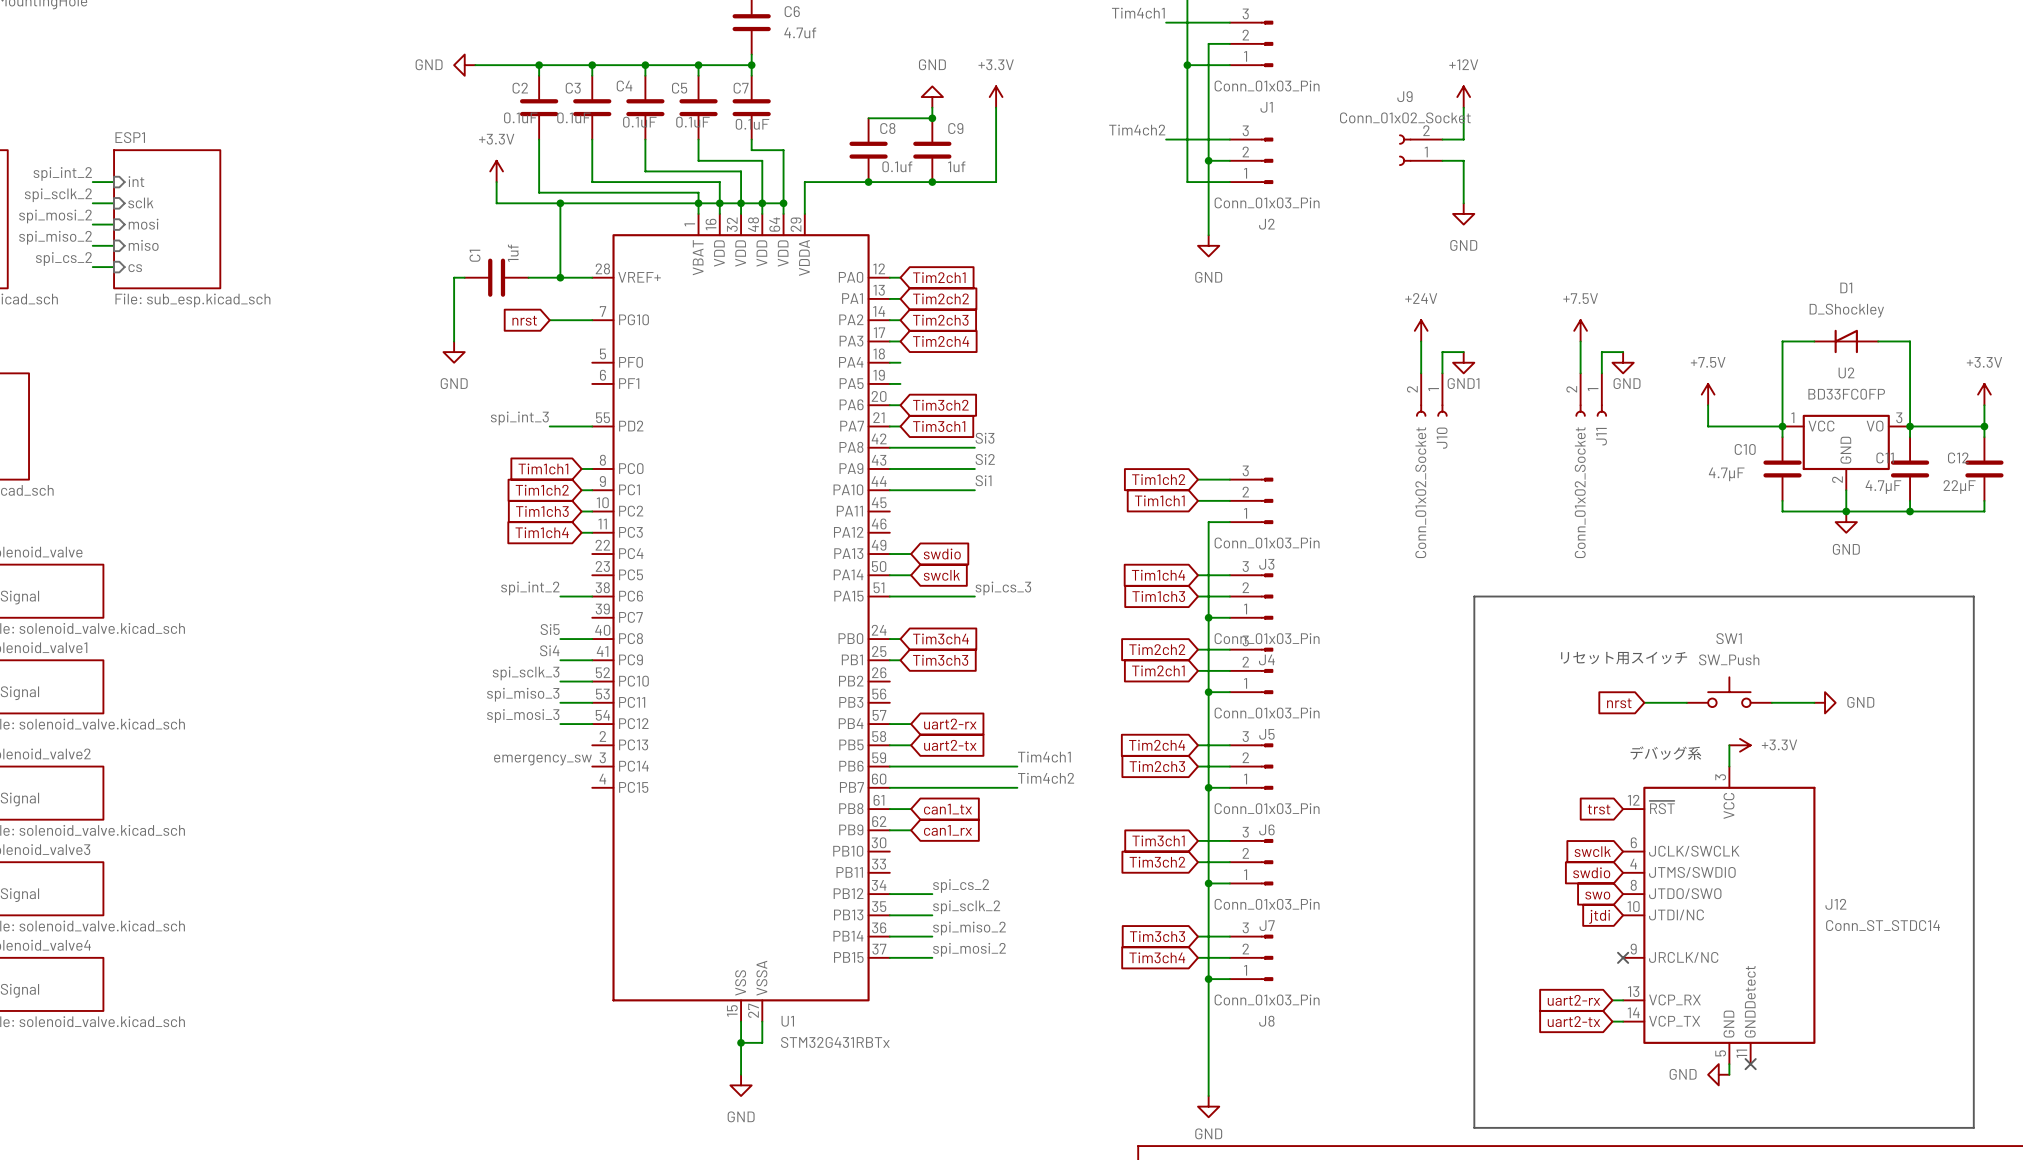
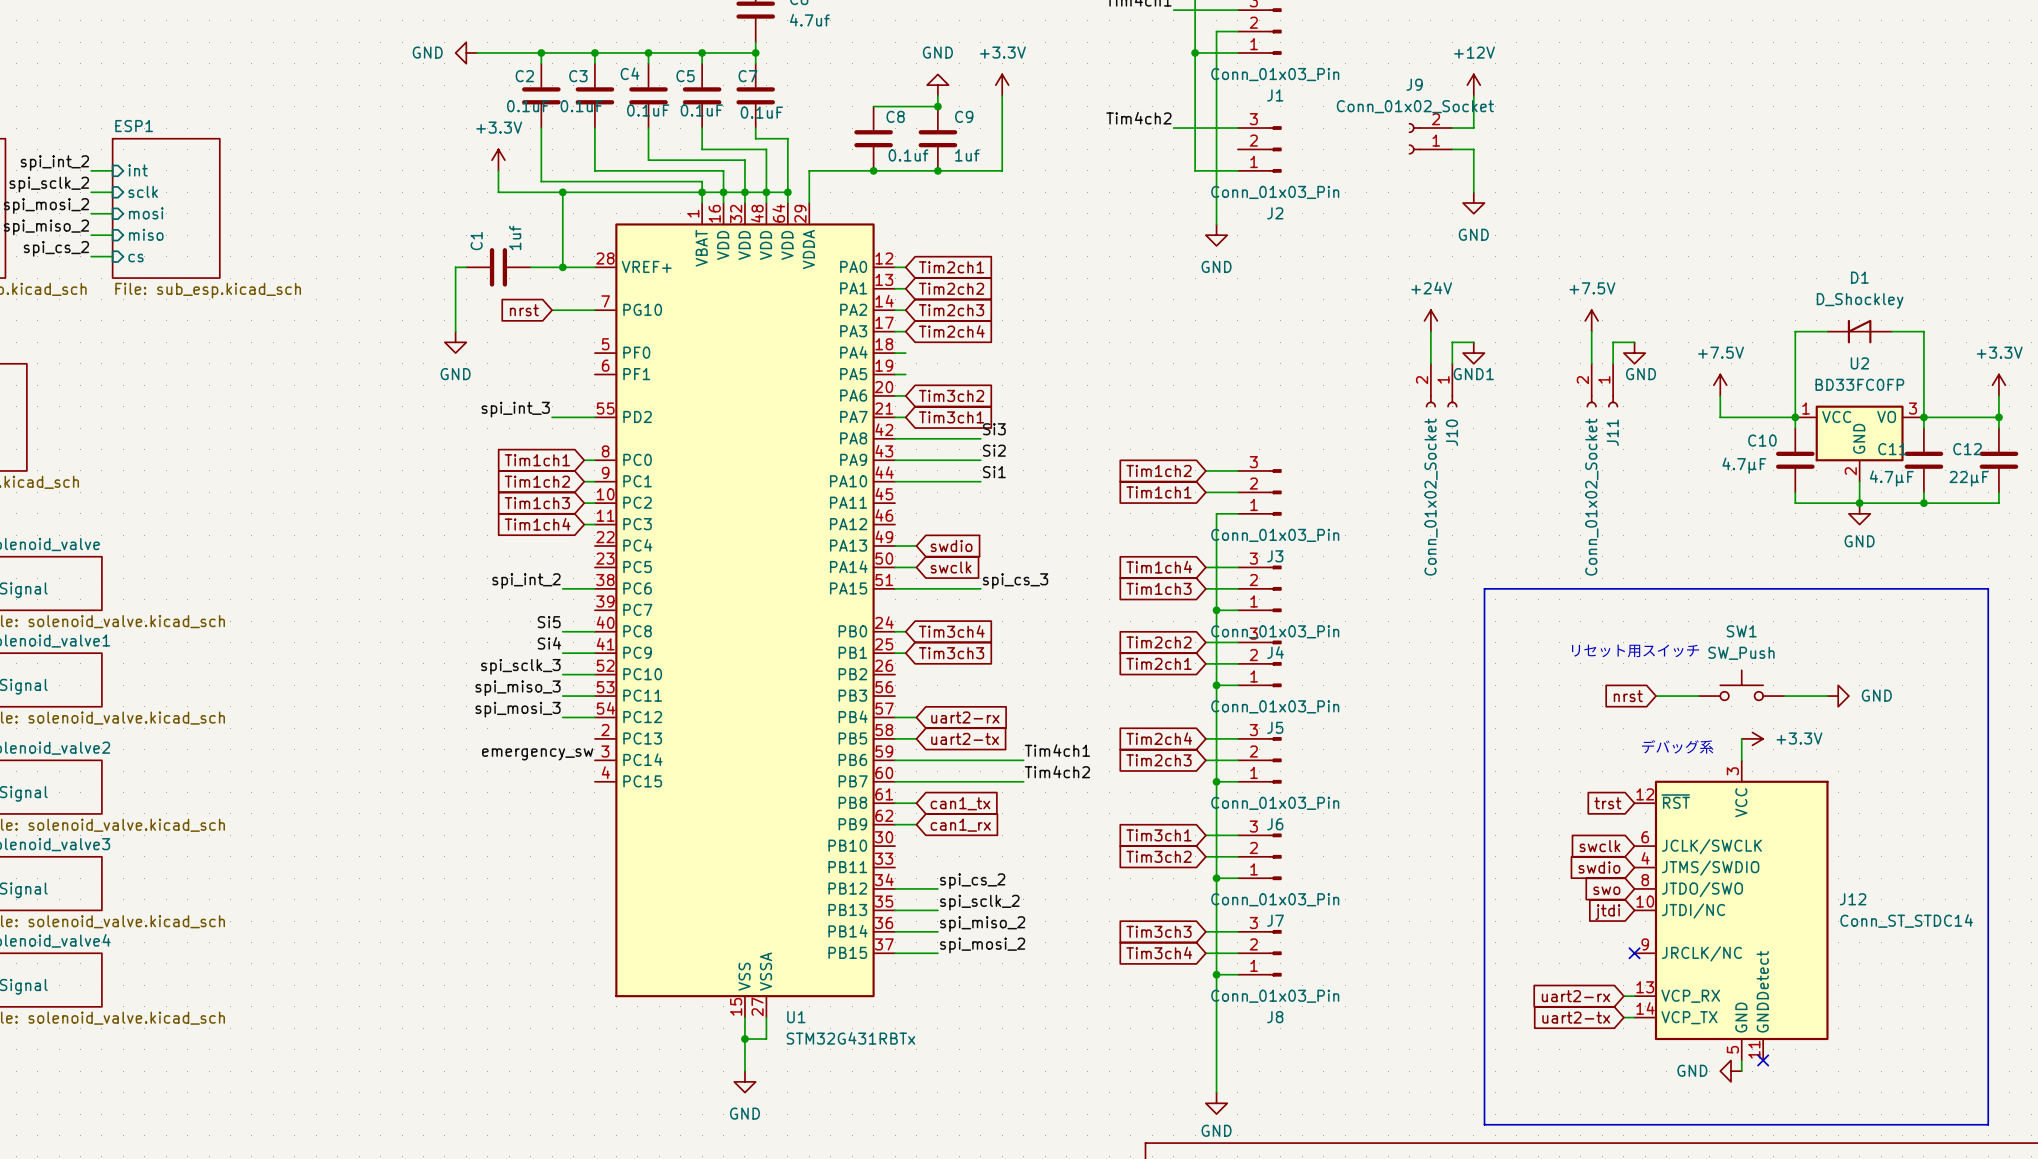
wire: (1208, 160) (1229, 160) -> none
junction: (1208, 160) -> none

